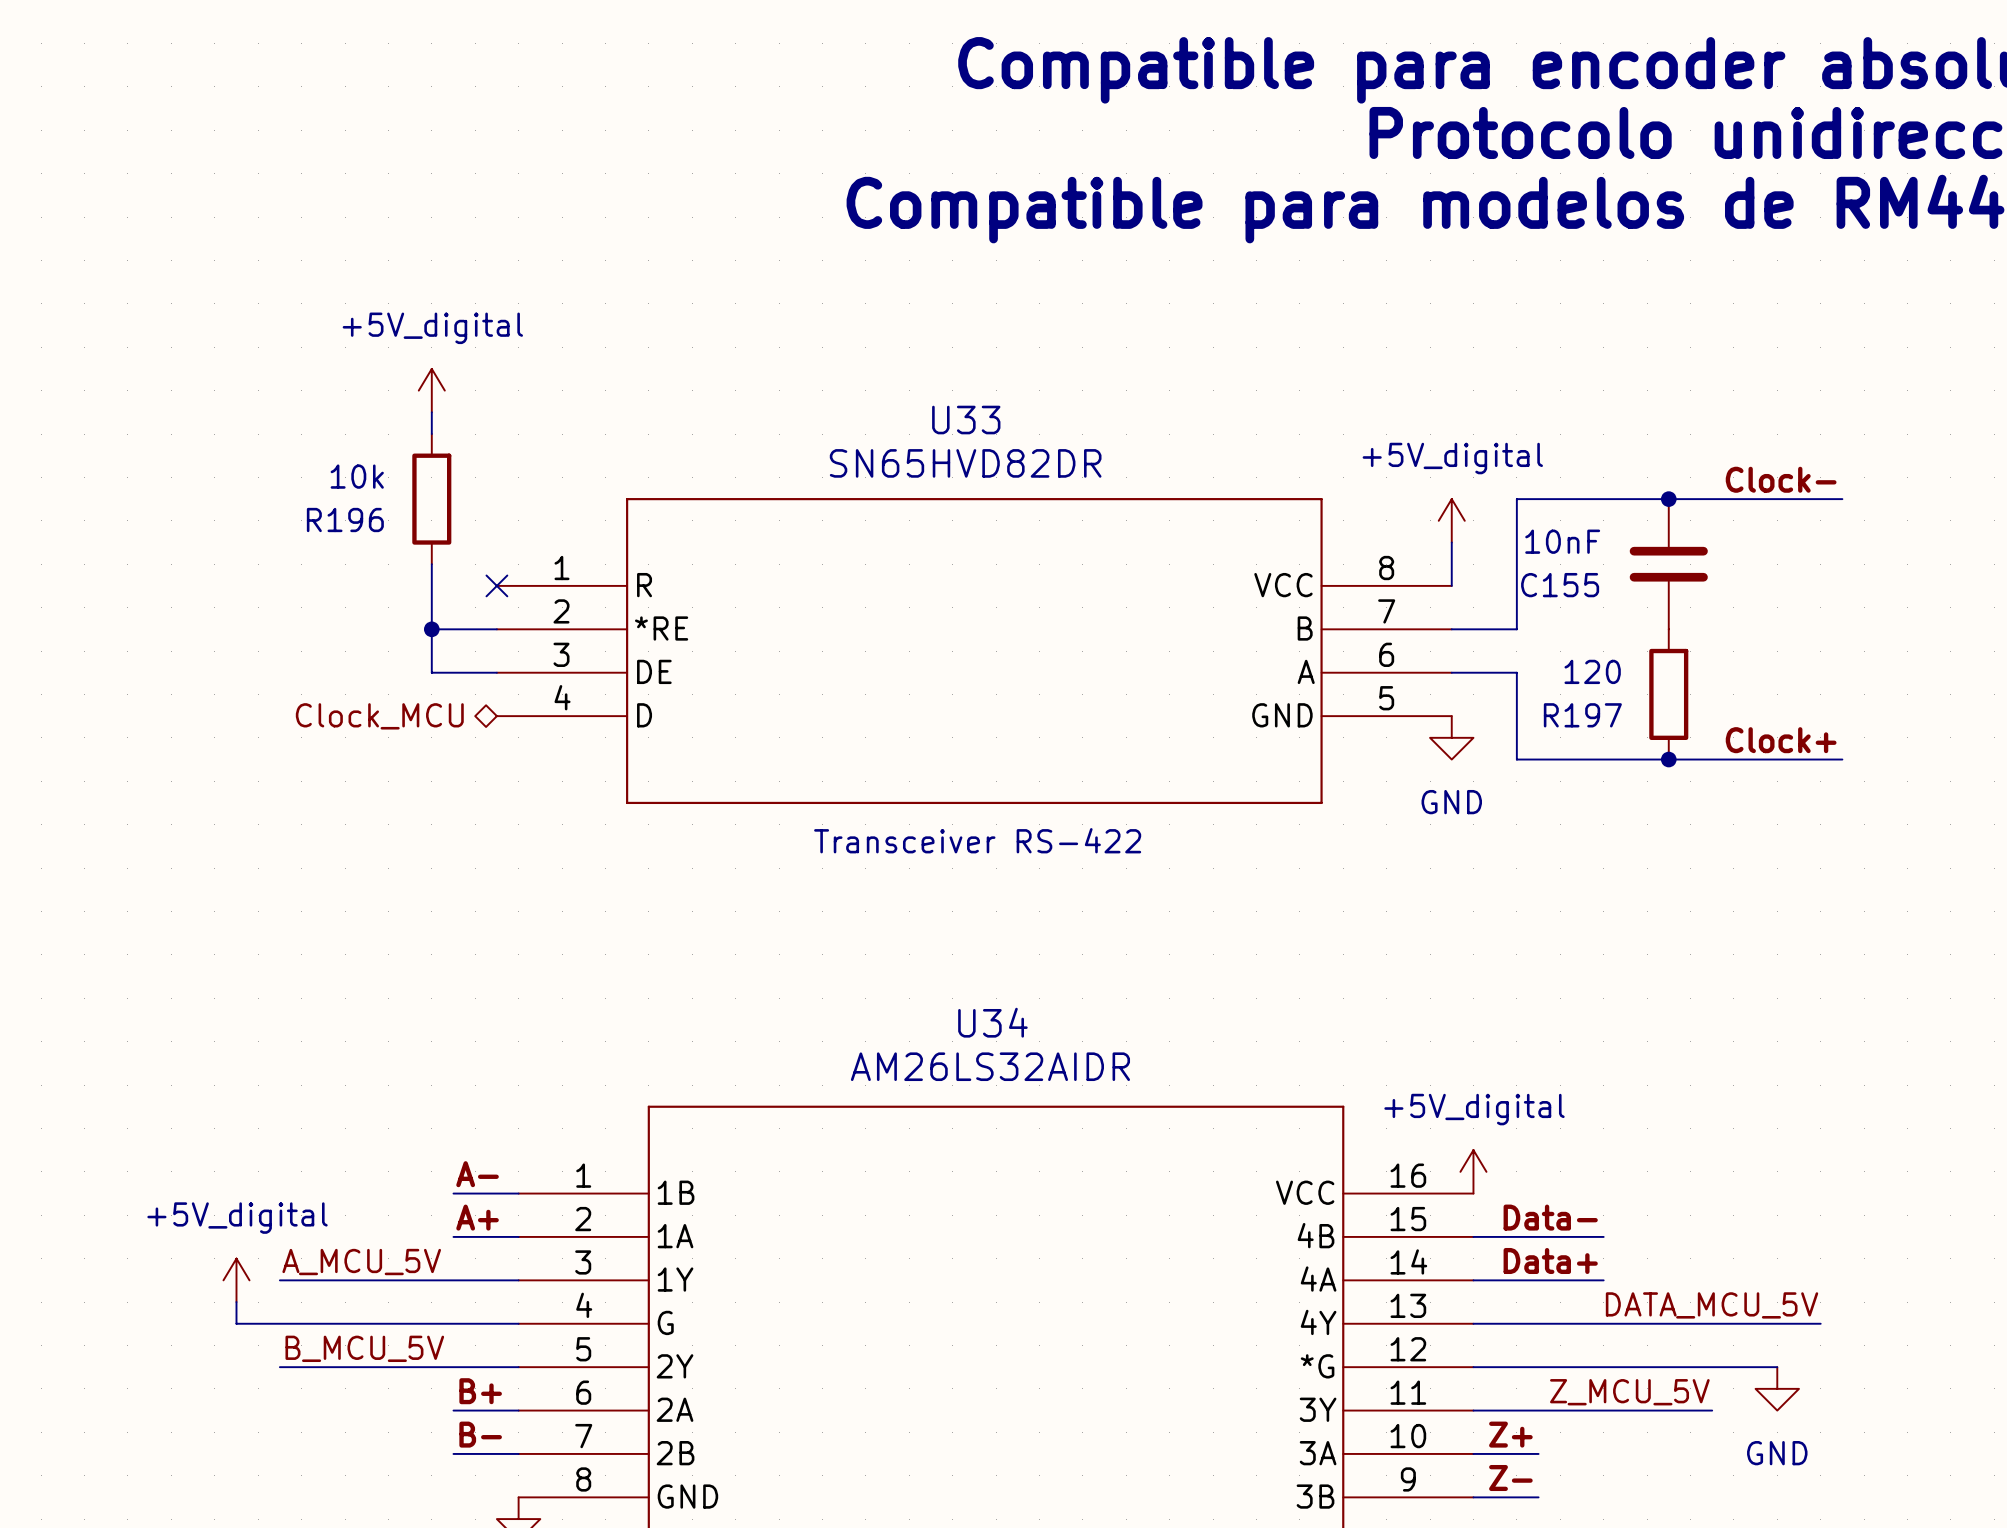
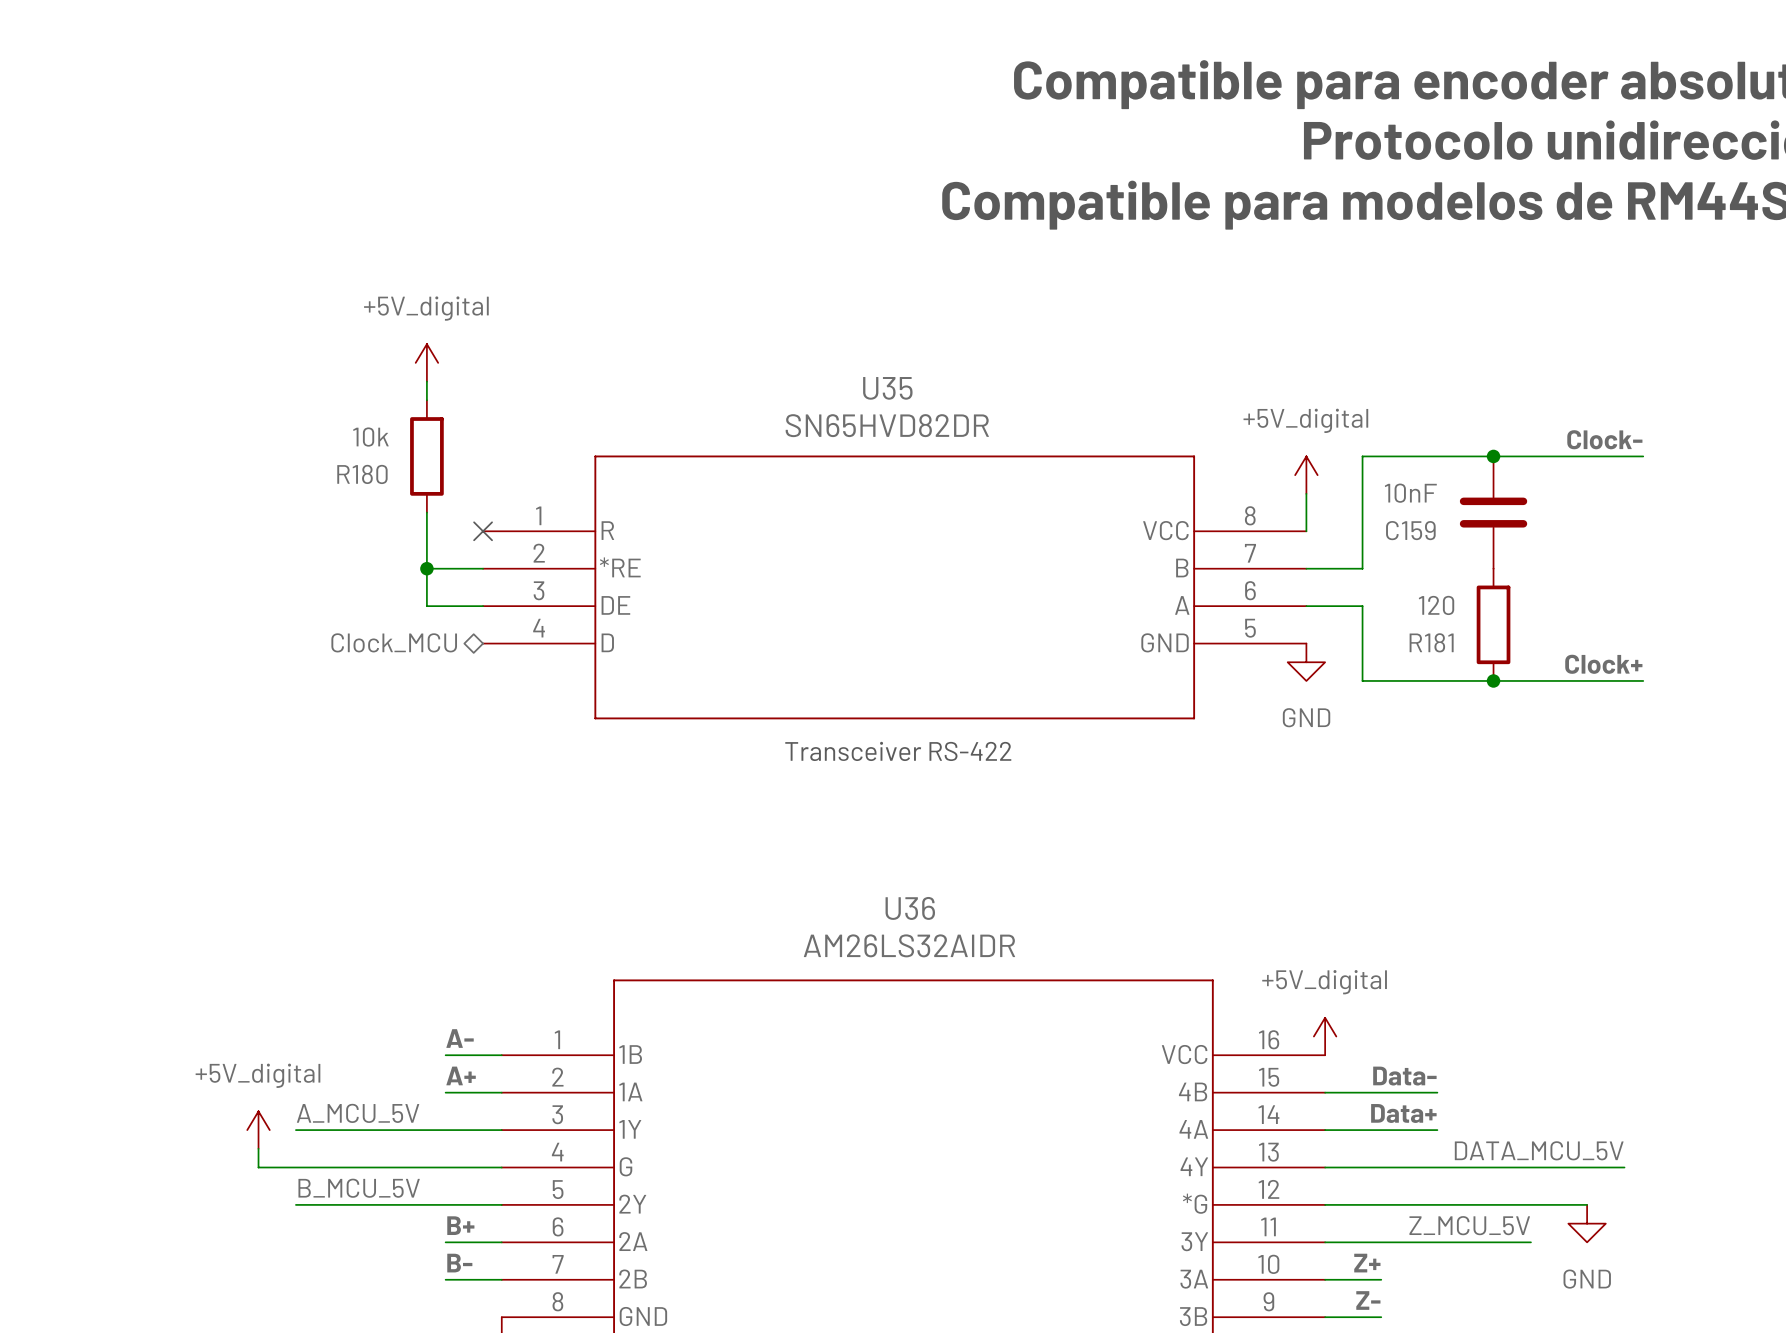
U33 name: U33 (966, 420) -> U35 (887, 388)
R196 name: R196 (345, 520) -> R180 (362, 474)
C155 name: C155 (1560, 585) -> C159 (1410, 530)
R197 name: R197 (1582, 715) -> R181 (1431, 642)
U34 name: U34 (992, 1022) -> U36 (910, 908)

